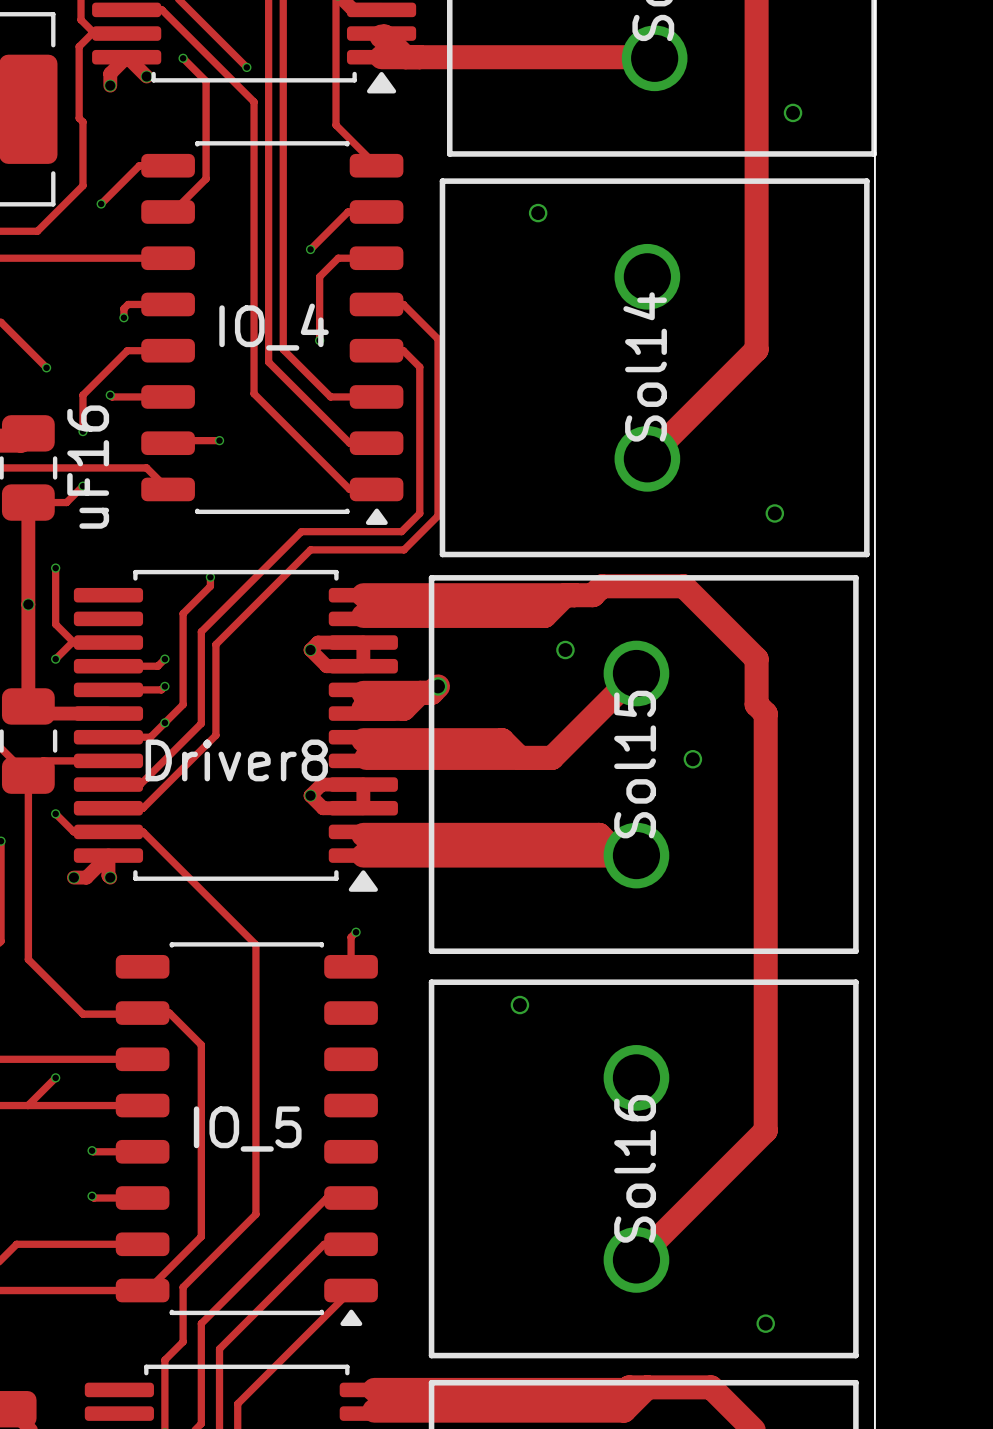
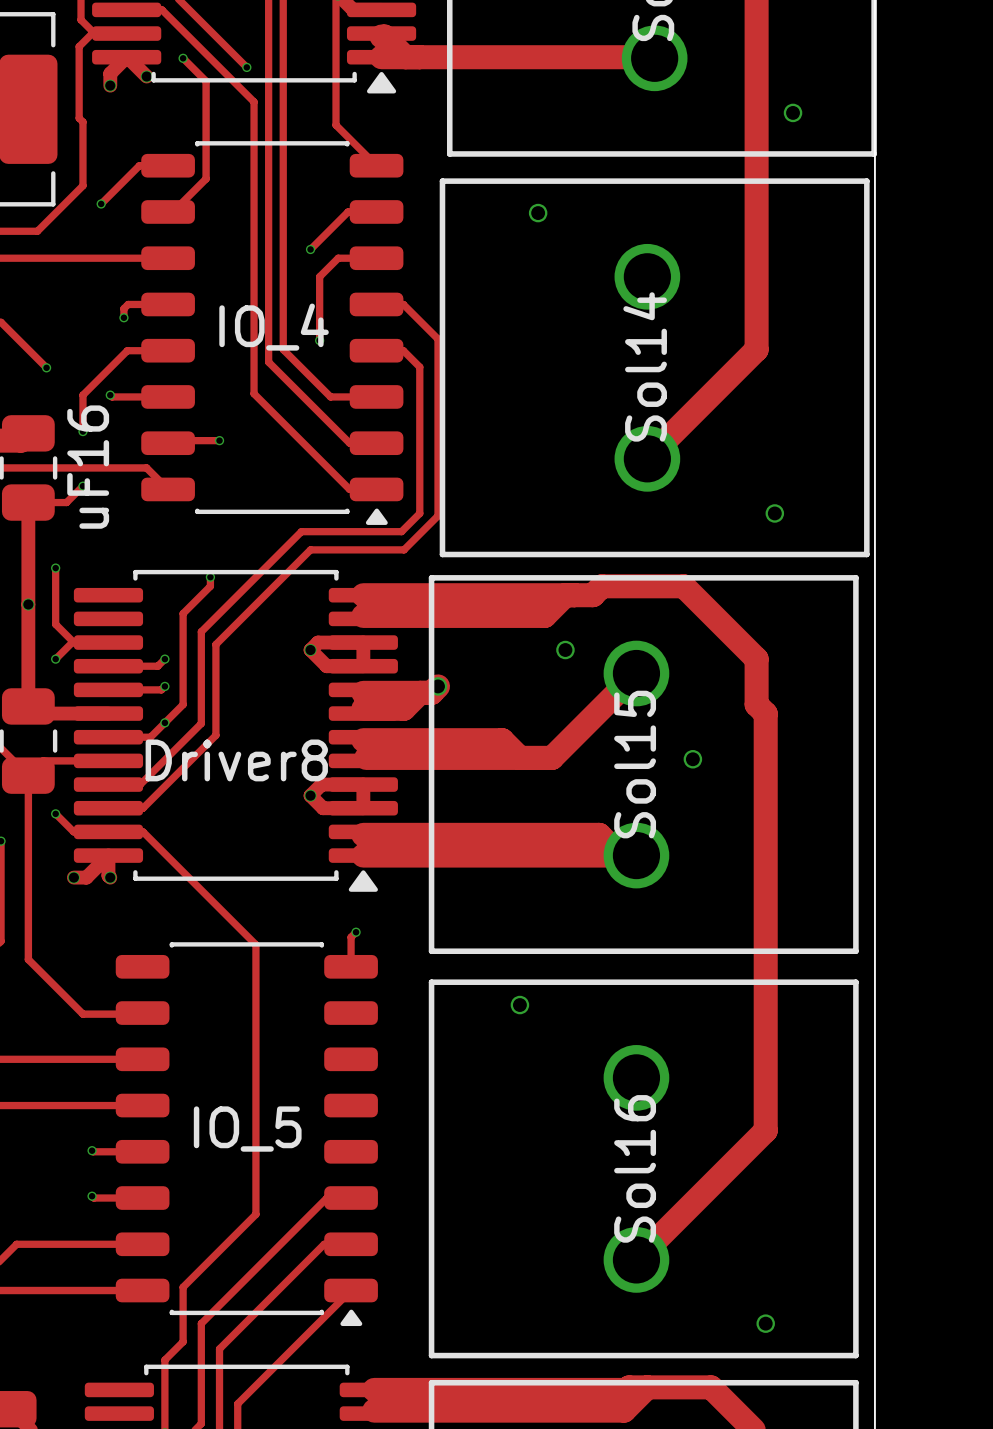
track: (142, 1013) (169, 1013) (201, 1044) (201, 1236) (147, 1290) (142, 1290) -> none
track: (55, 1077) (27, 1105) -> none
via: (55, 1077) -> none

